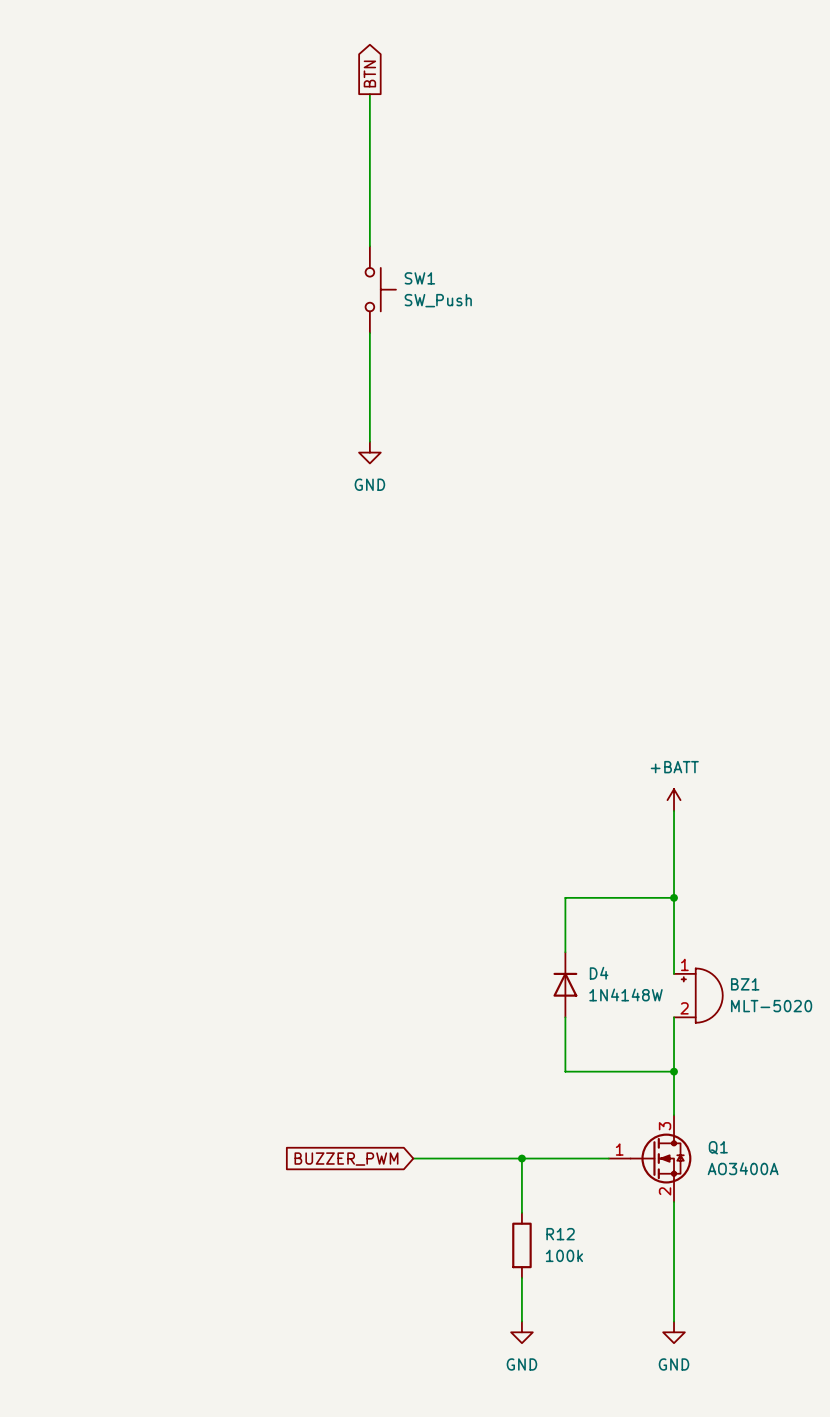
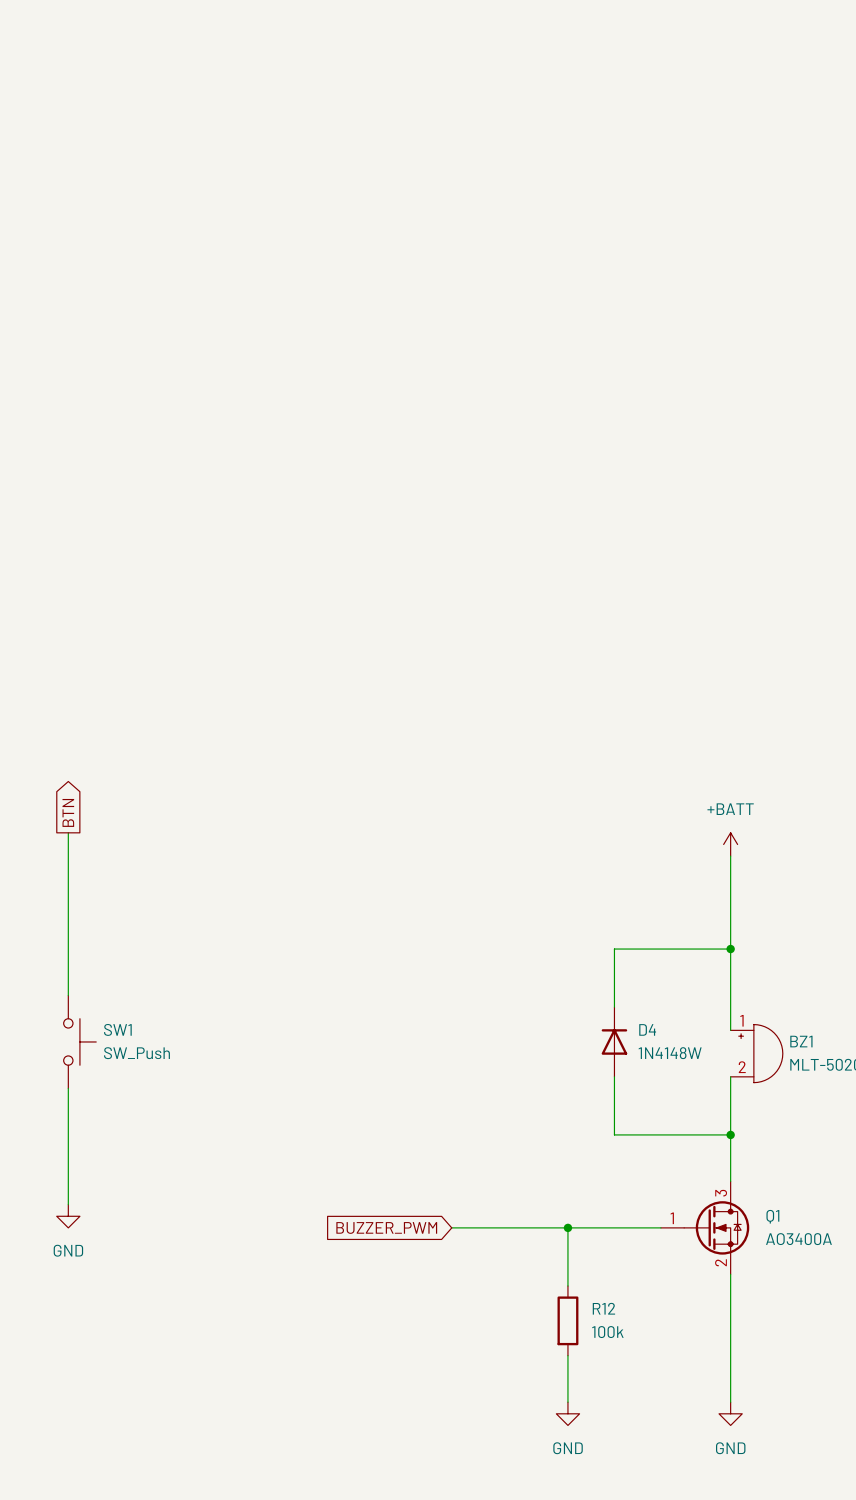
global label: BTN (369, 73) -> none
wire: (369, 94) (369, 246) -> none
SW1 position: (380, 289) -> (79, 1041)
wire: (369, 333) (369, 441) -> none
power symbol: GND (369, 452) -> none
global label: none -> BTN (68, 812)
wire: none -> (68, 832) (68, 995)
wire: none -> (68, 1088) (68, 1204)
power symbol: none -> GND (68, 1216)

